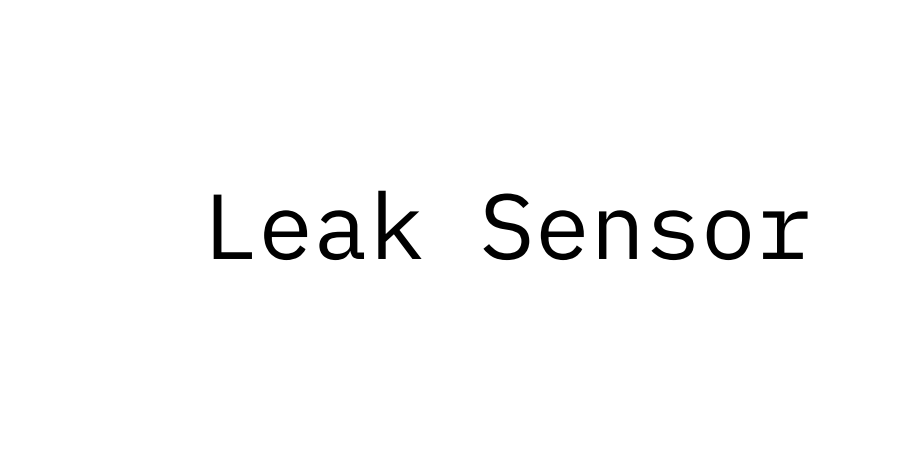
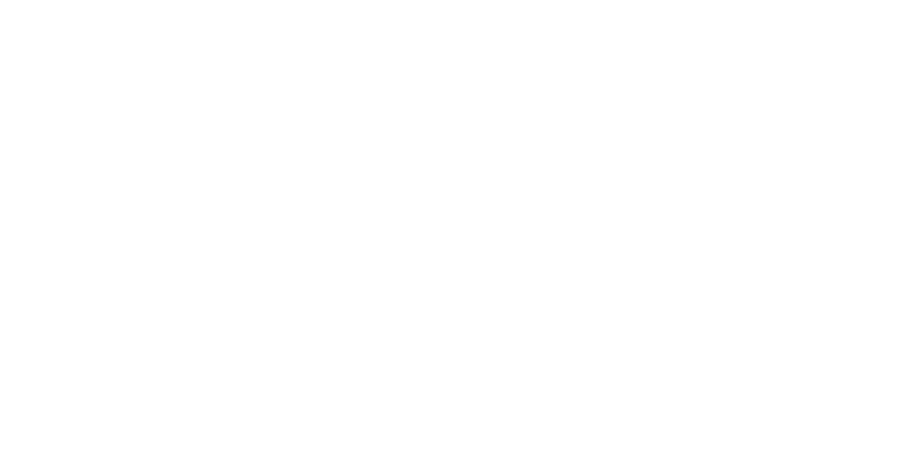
text: Leak Sensor (510, 225) -> none

